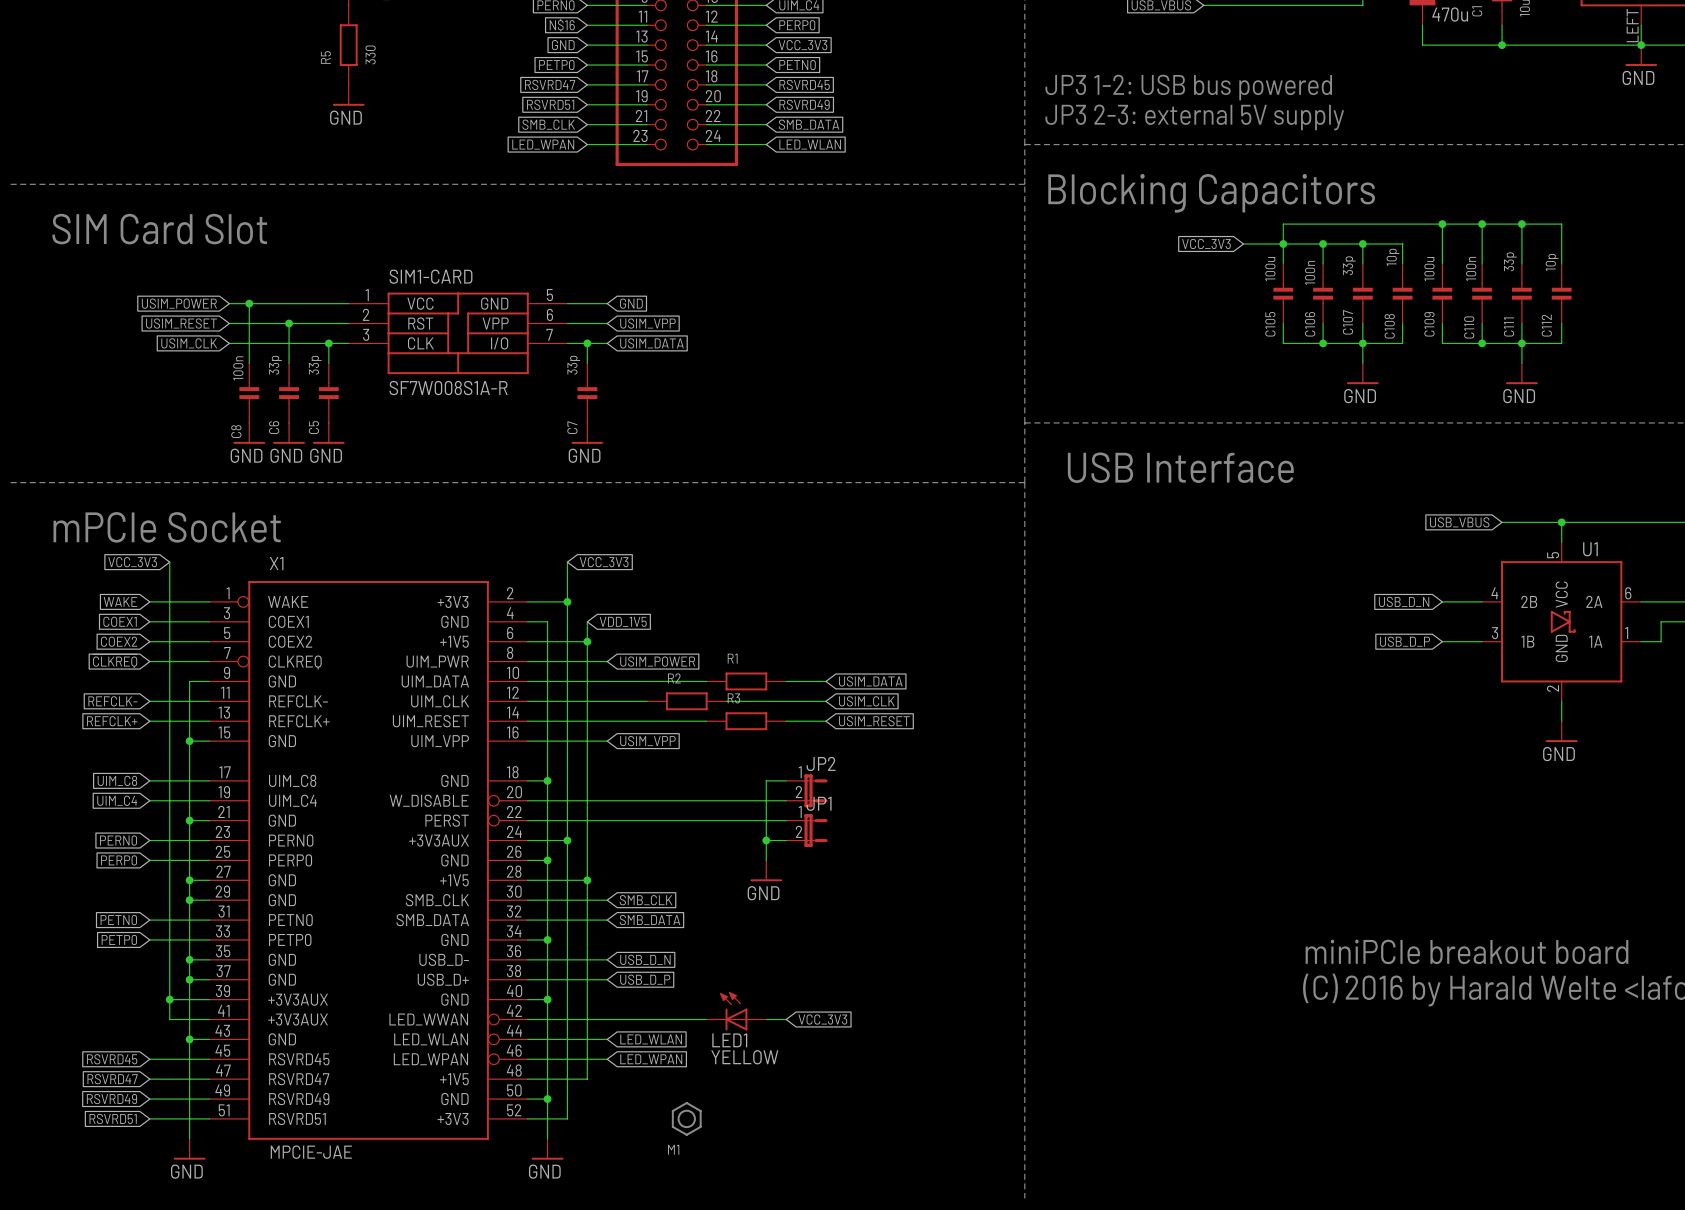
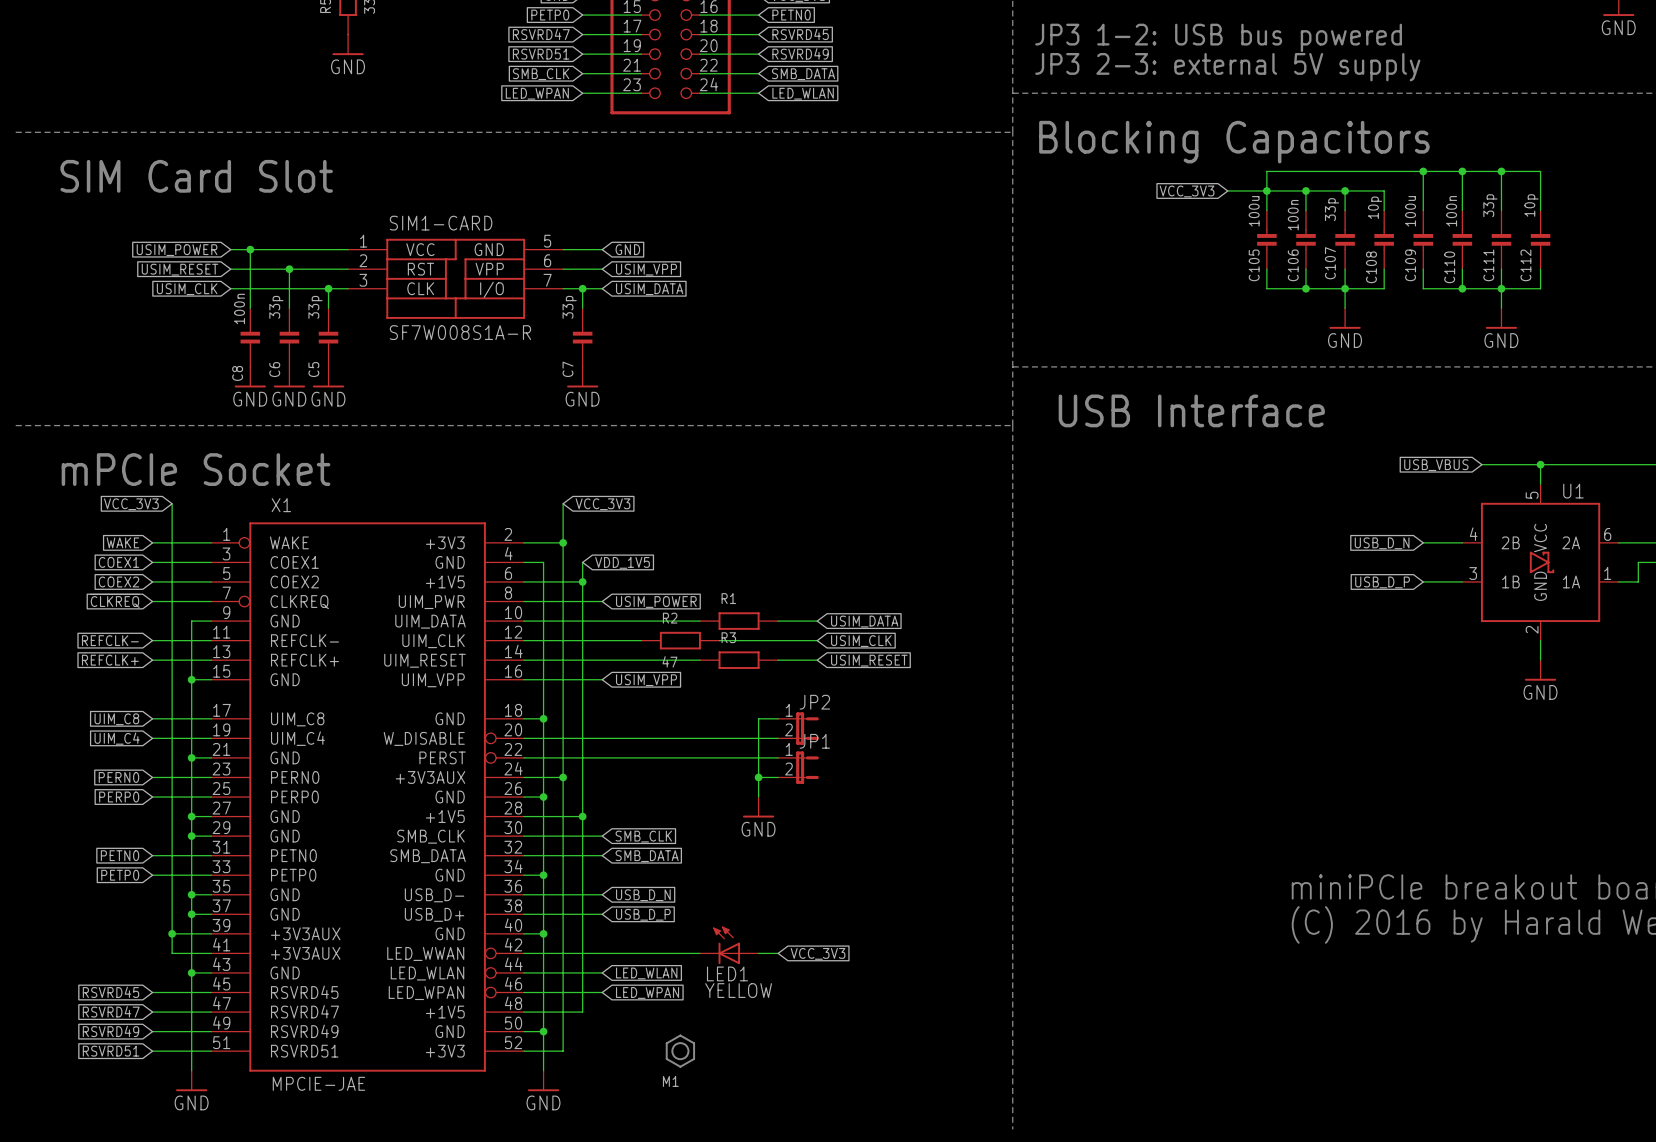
R2 value: none -> 47 (669, 661)

